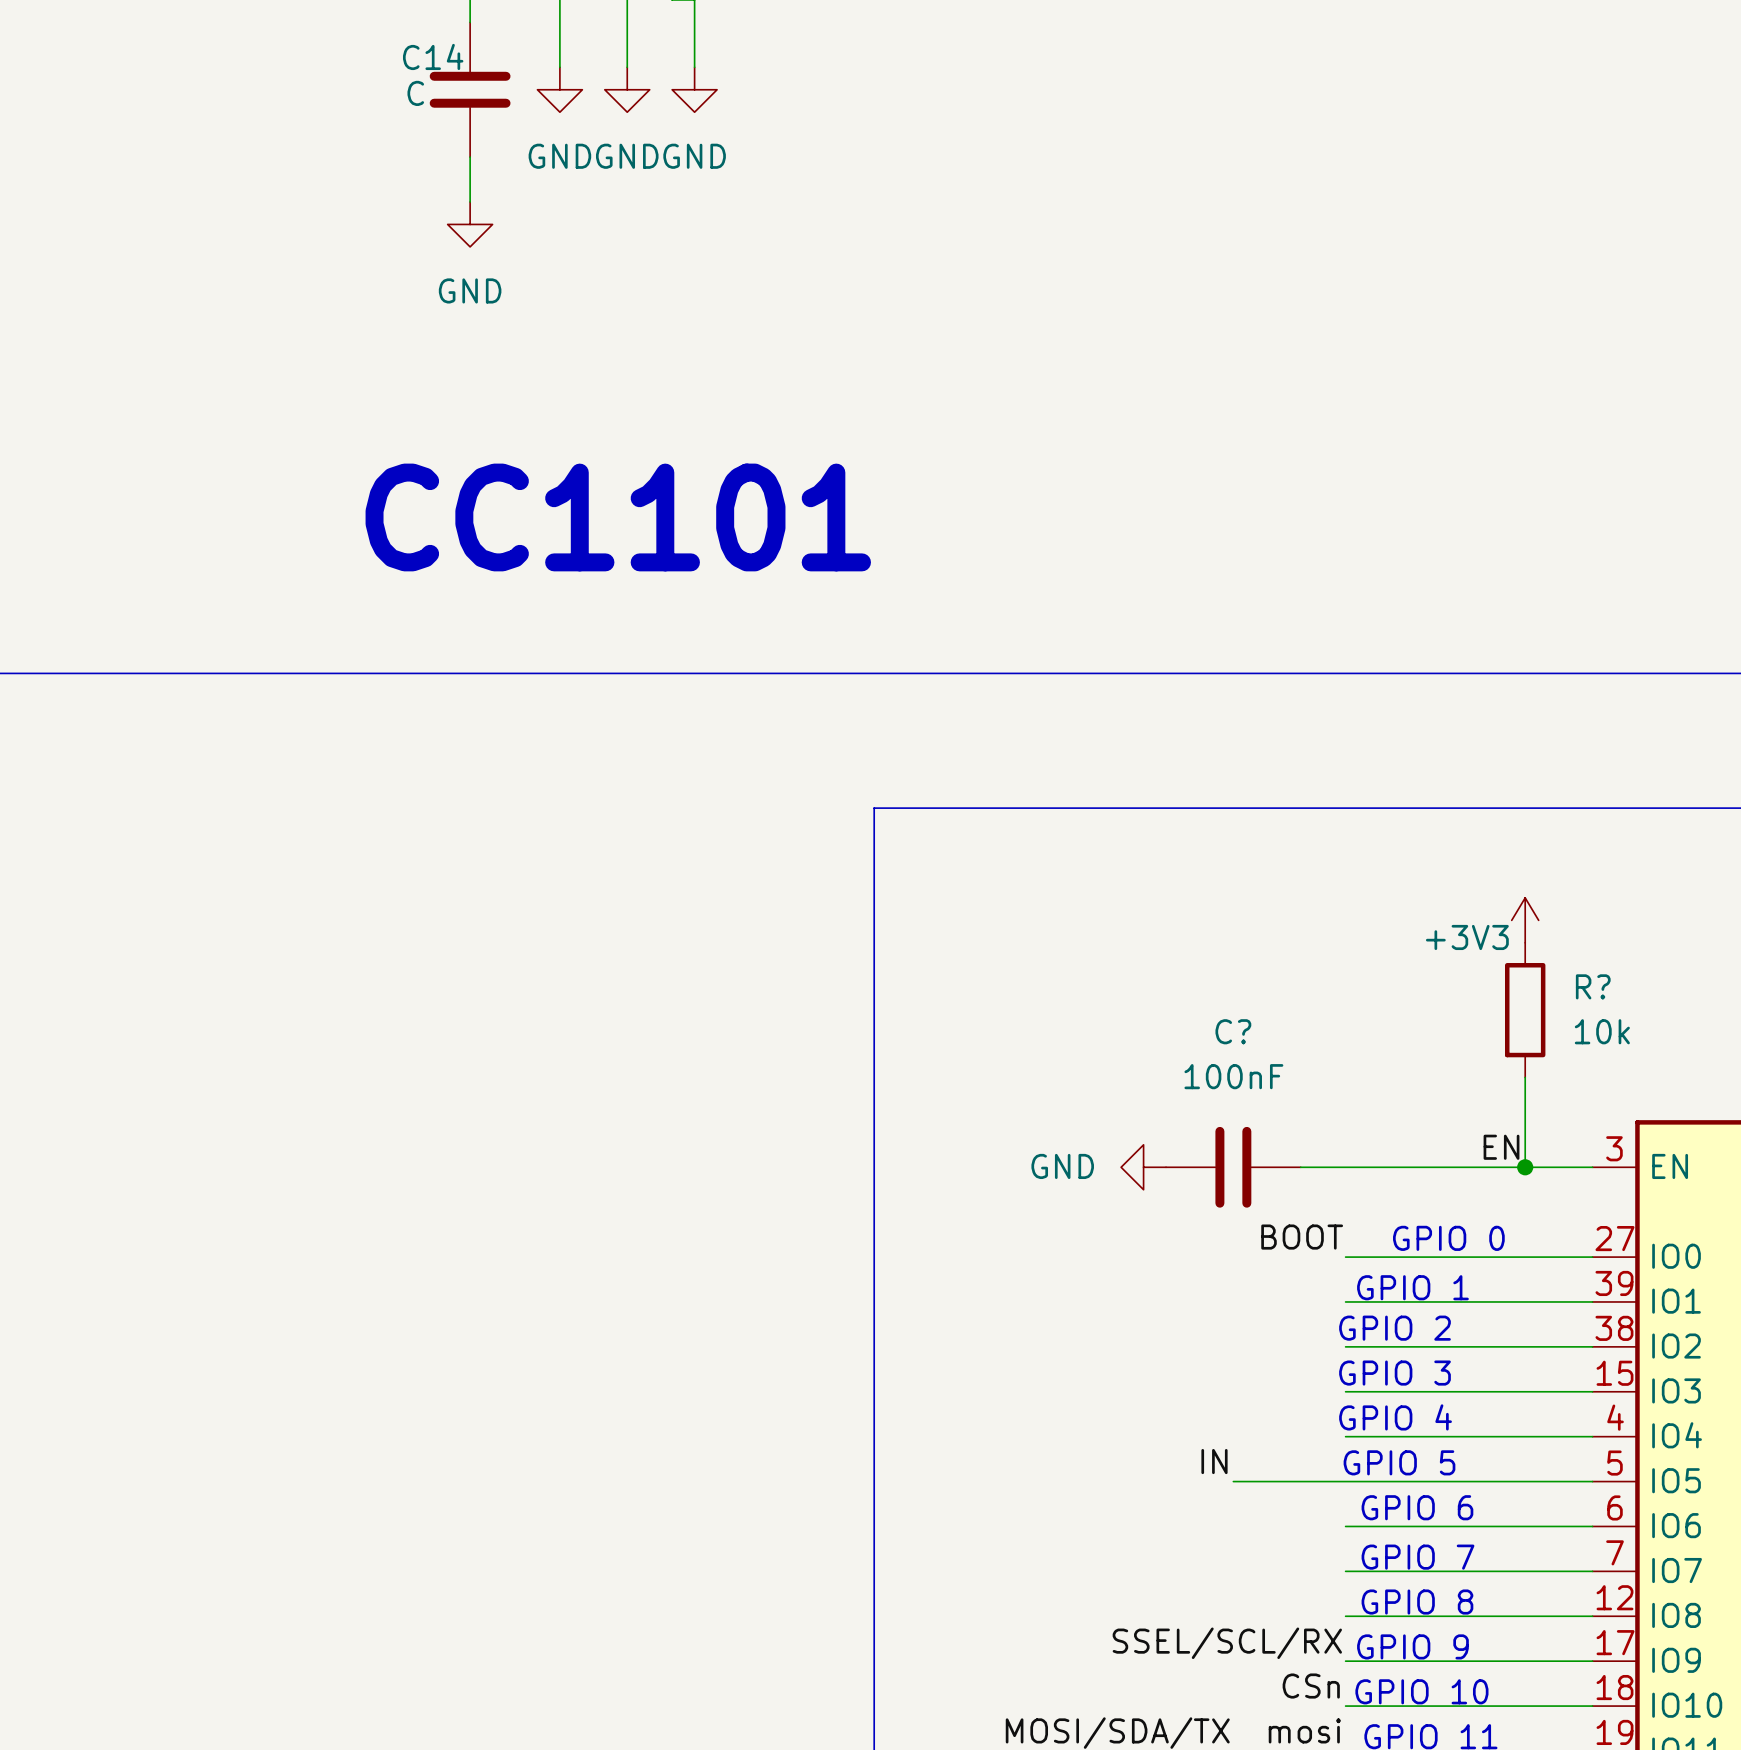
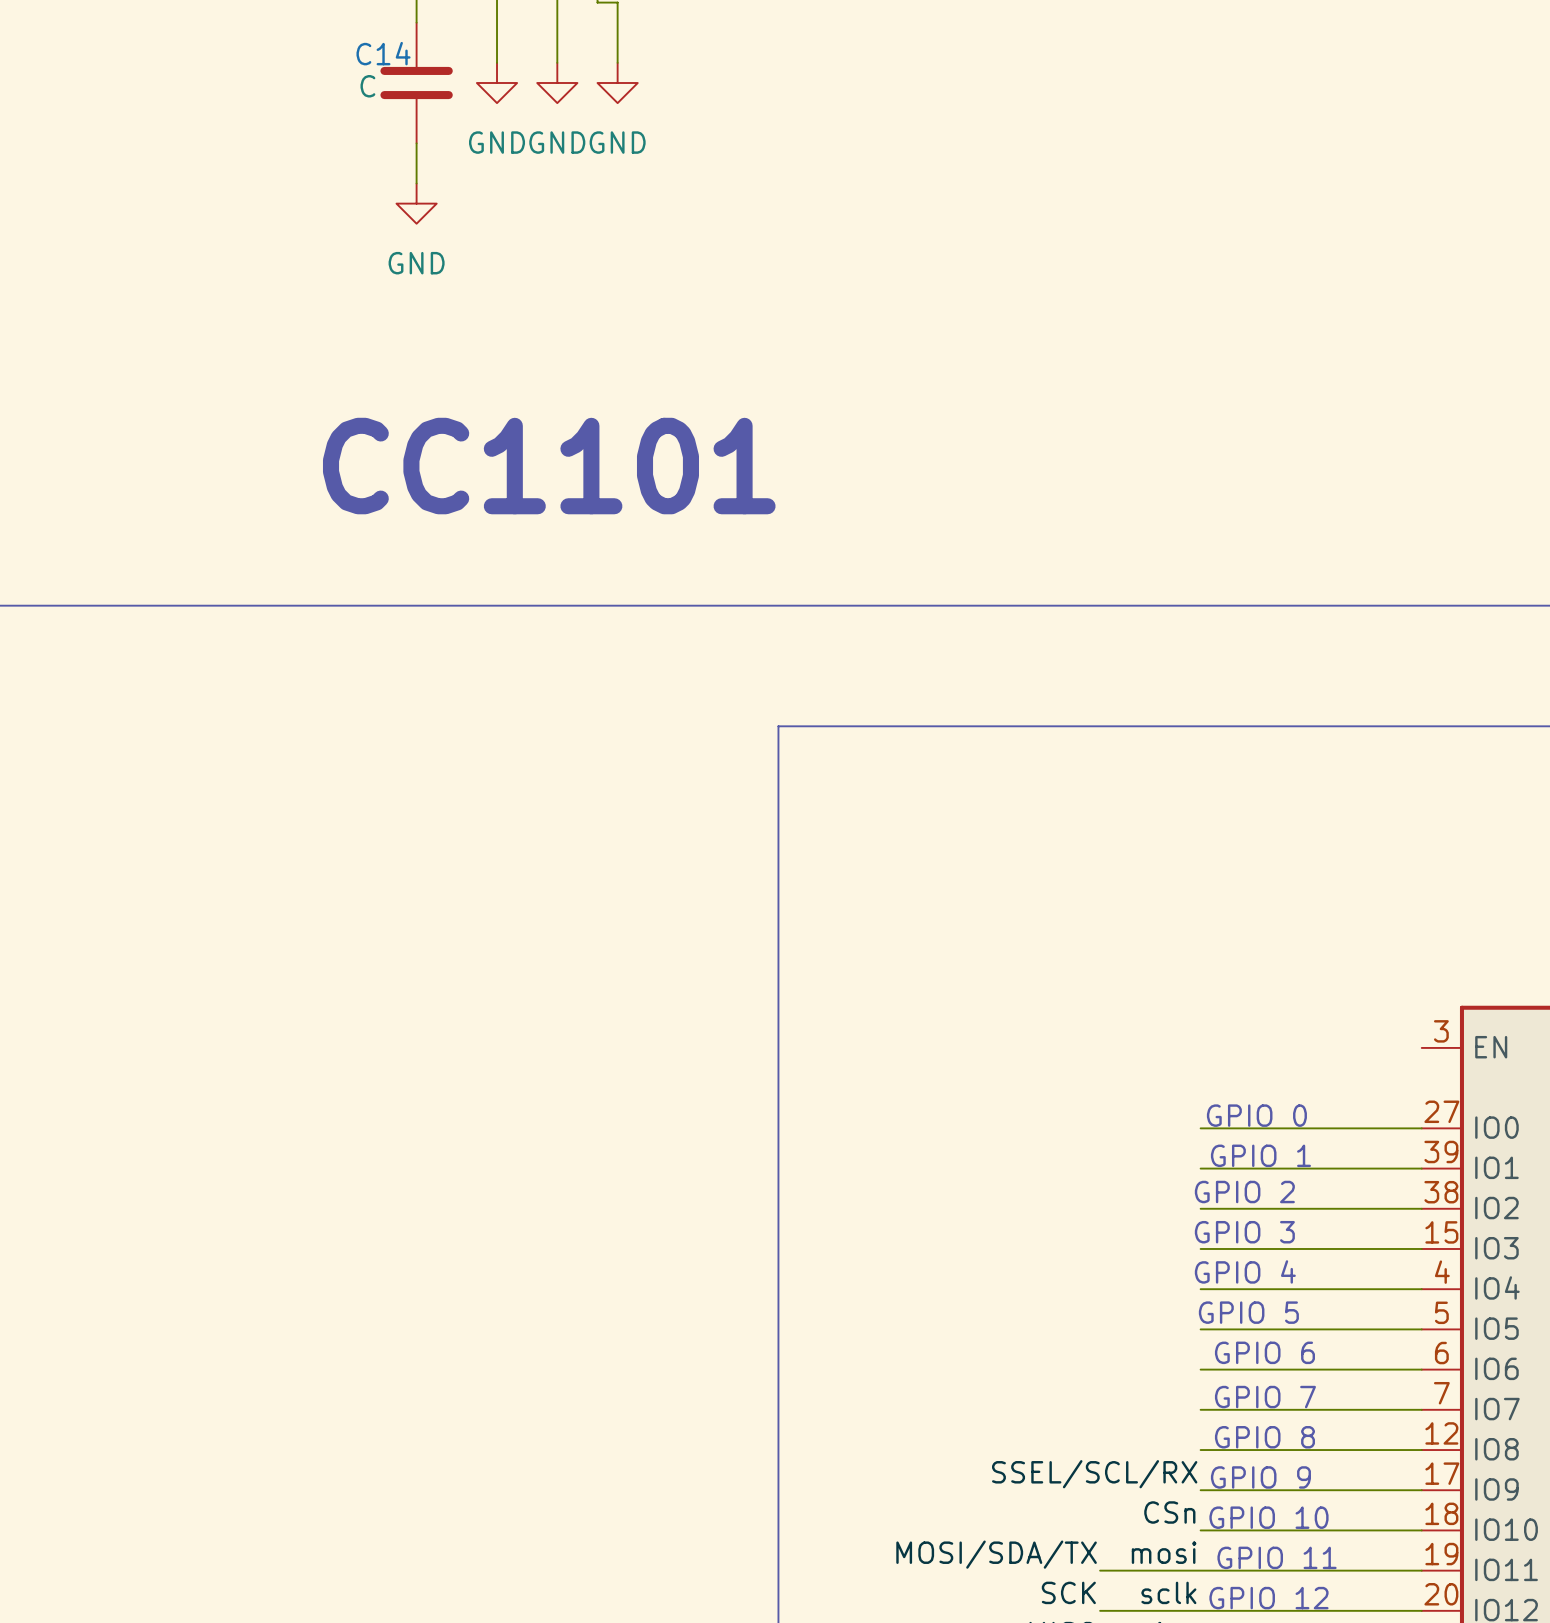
power symbol: +3V3 (1525, 920) -> none
R?: 10k (1525, 1010) -> none
wire: (1525, 1077) (1525, 1167) -> none
label: EN (1501, 1147) -> none
power symbol: GND (1143, 1167) -> none
C?: 100nF (1233, 1167) -> none
wire: (1300, 1167) (1592, 1167) -> none
junction: (1525, 1167) -> none
label: BOOT (1302, 1237) -> none
text position: GPIO 0 (1448, 1238) -> GPIO 0 (1256, 1115)
label: IN (1214, 1461) -> none
wire: (1233, 1481) (1345, 1481) -> none

